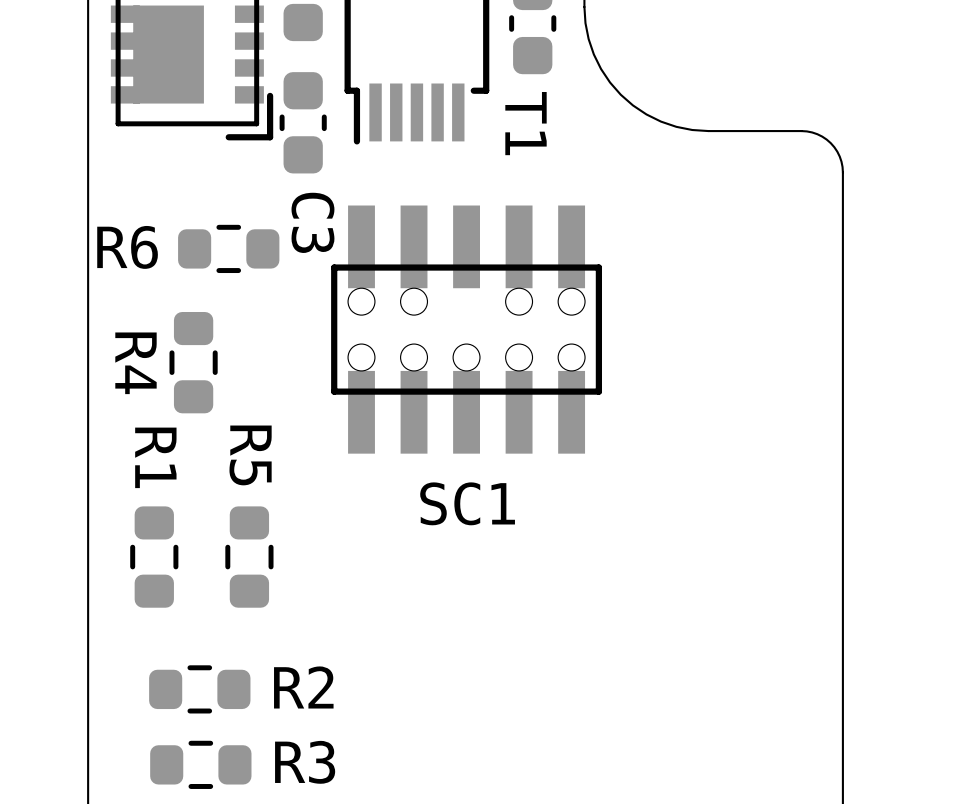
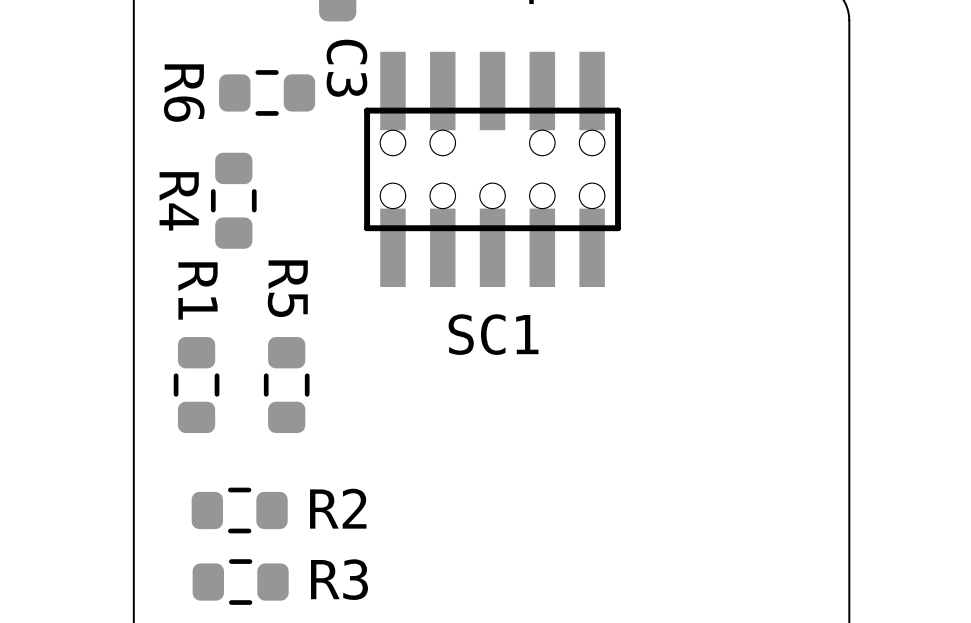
R6 name rotation: 0° (127, 247) -> 90° clockwise (184, 93)

